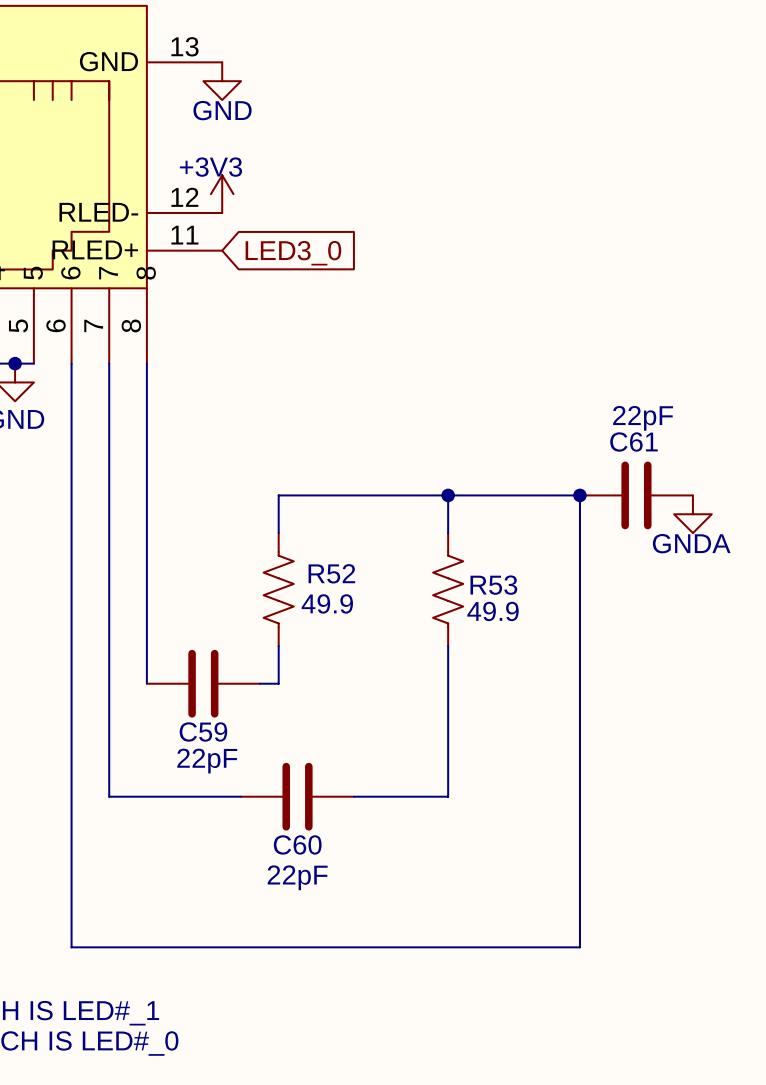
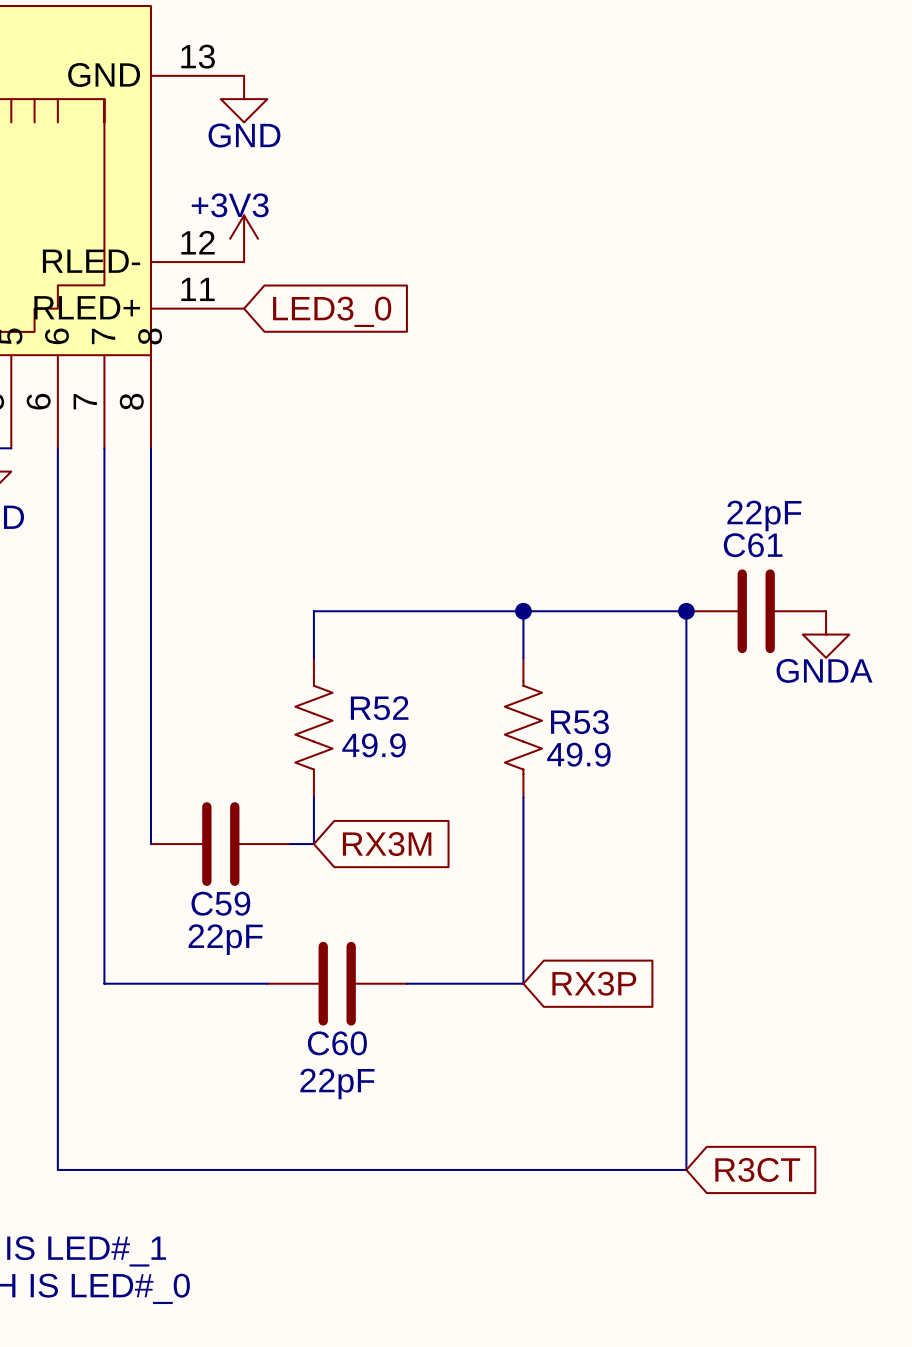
global label: none -> RX3M (387, 844)
global label: none -> RX3P (594, 983)
global label: none -> R3CT (757, 1169)

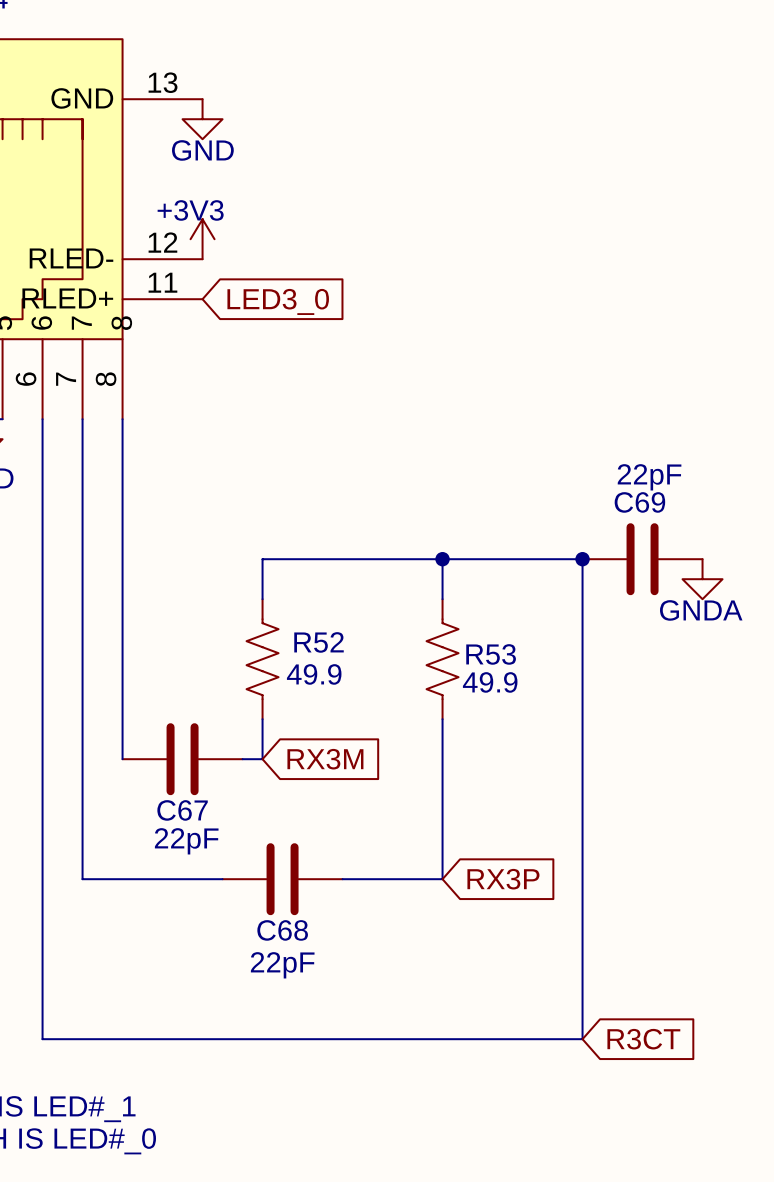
C61 name: C61 (753, 545) -> C69 (639, 502)
C59 name: C59 (220, 903) -> C67 (182, 810)
C60 name: C60 (337, 1043) -> C68 (282, 930)

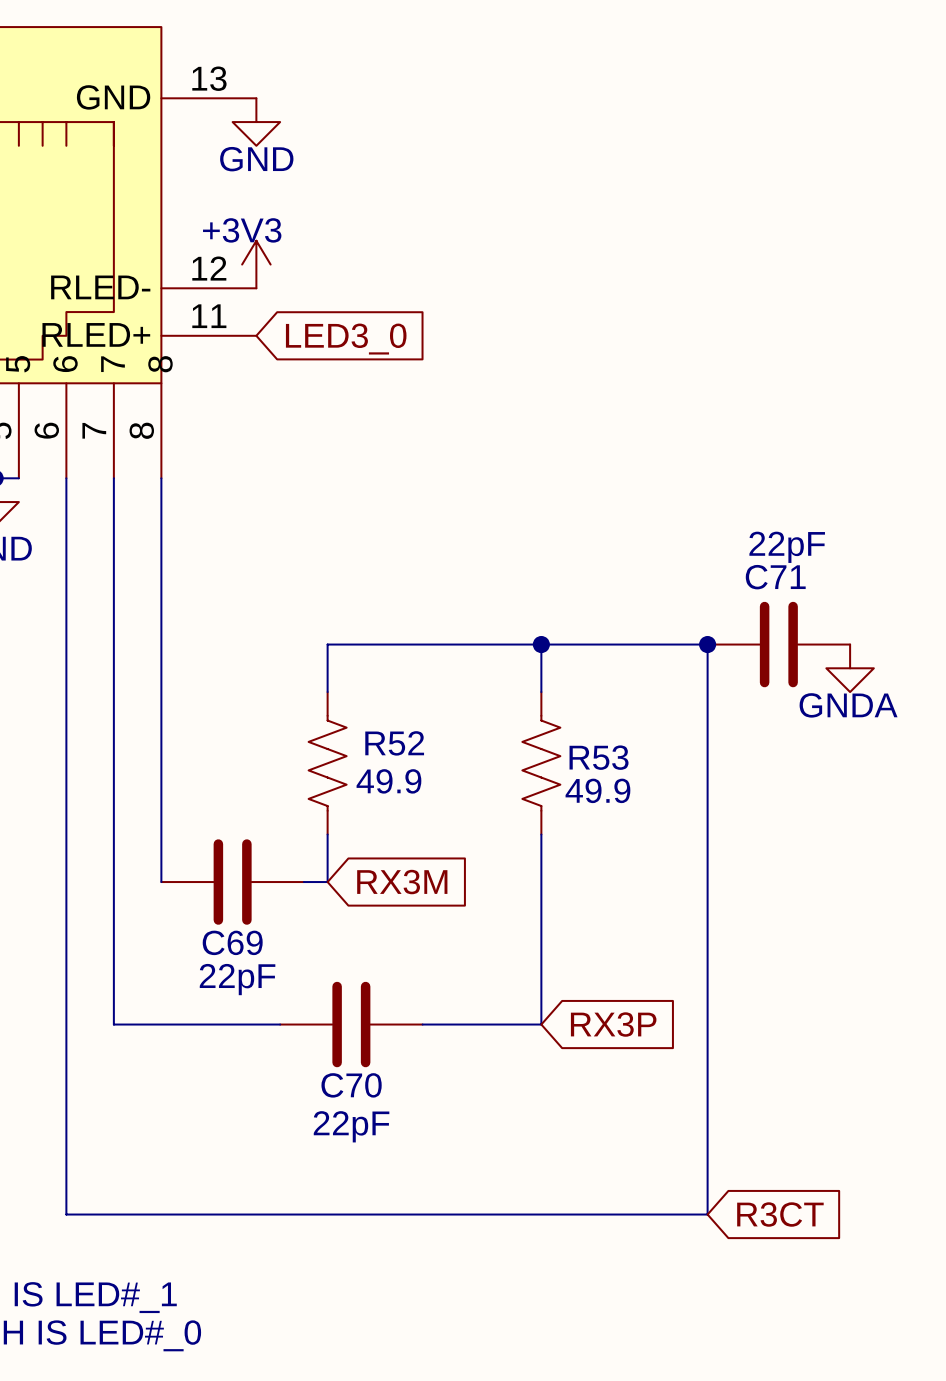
C69 name: C69 (639, 502) -> C71 (775, 577)
C67 name: C67 (182, 810) -> C69 (232, 942)
C68 name: C68 (282, 930) -> C70 (351, 1085)

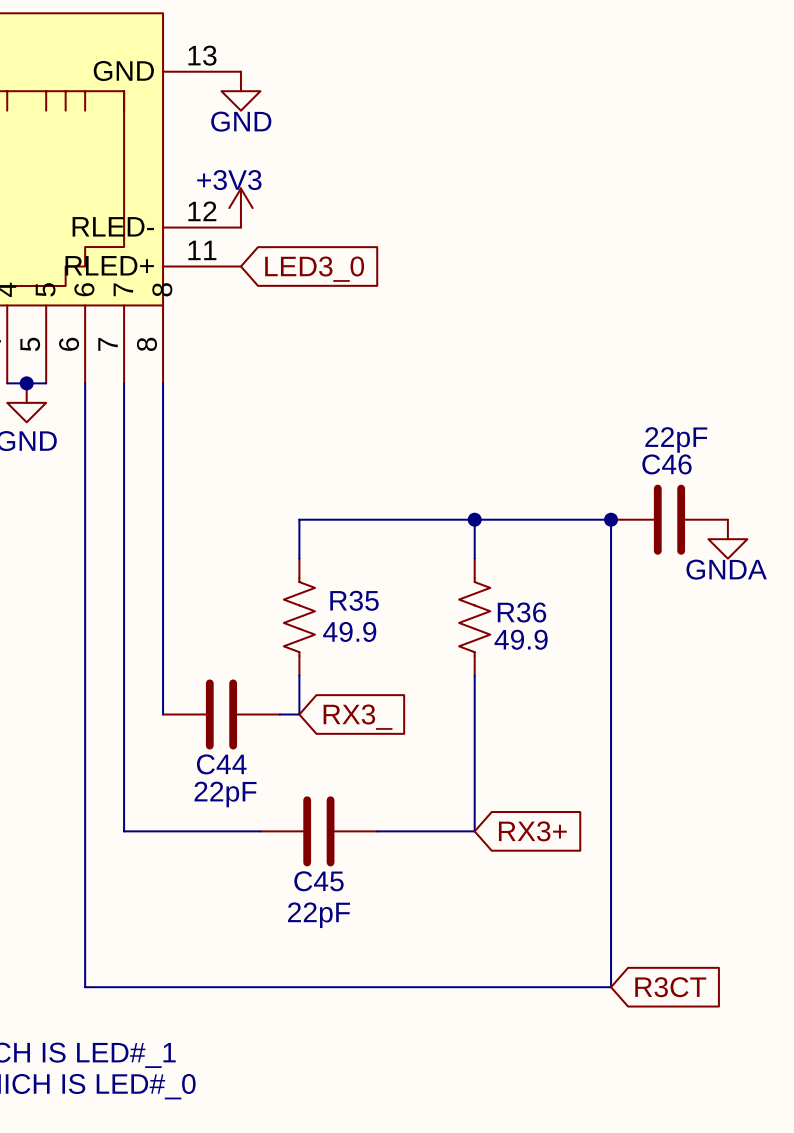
C71 name: C71 (775, 577) -> C46 (666, 464)
R52 name: R52 (394, 743) -> R35 (354, 600)
R53 name: R53 (599, 757) -> R36 (521, 612)
global label: RX3M (402, 882) -> RX3_ (358, 717)
C69 name: C69 (232, 942) -> C44 (221, 764)
global label: RX3P (613, 1024) -> RX3+ (532, 831)
C70 name: C70 (351, 1085) -> C45 (318, 881)

